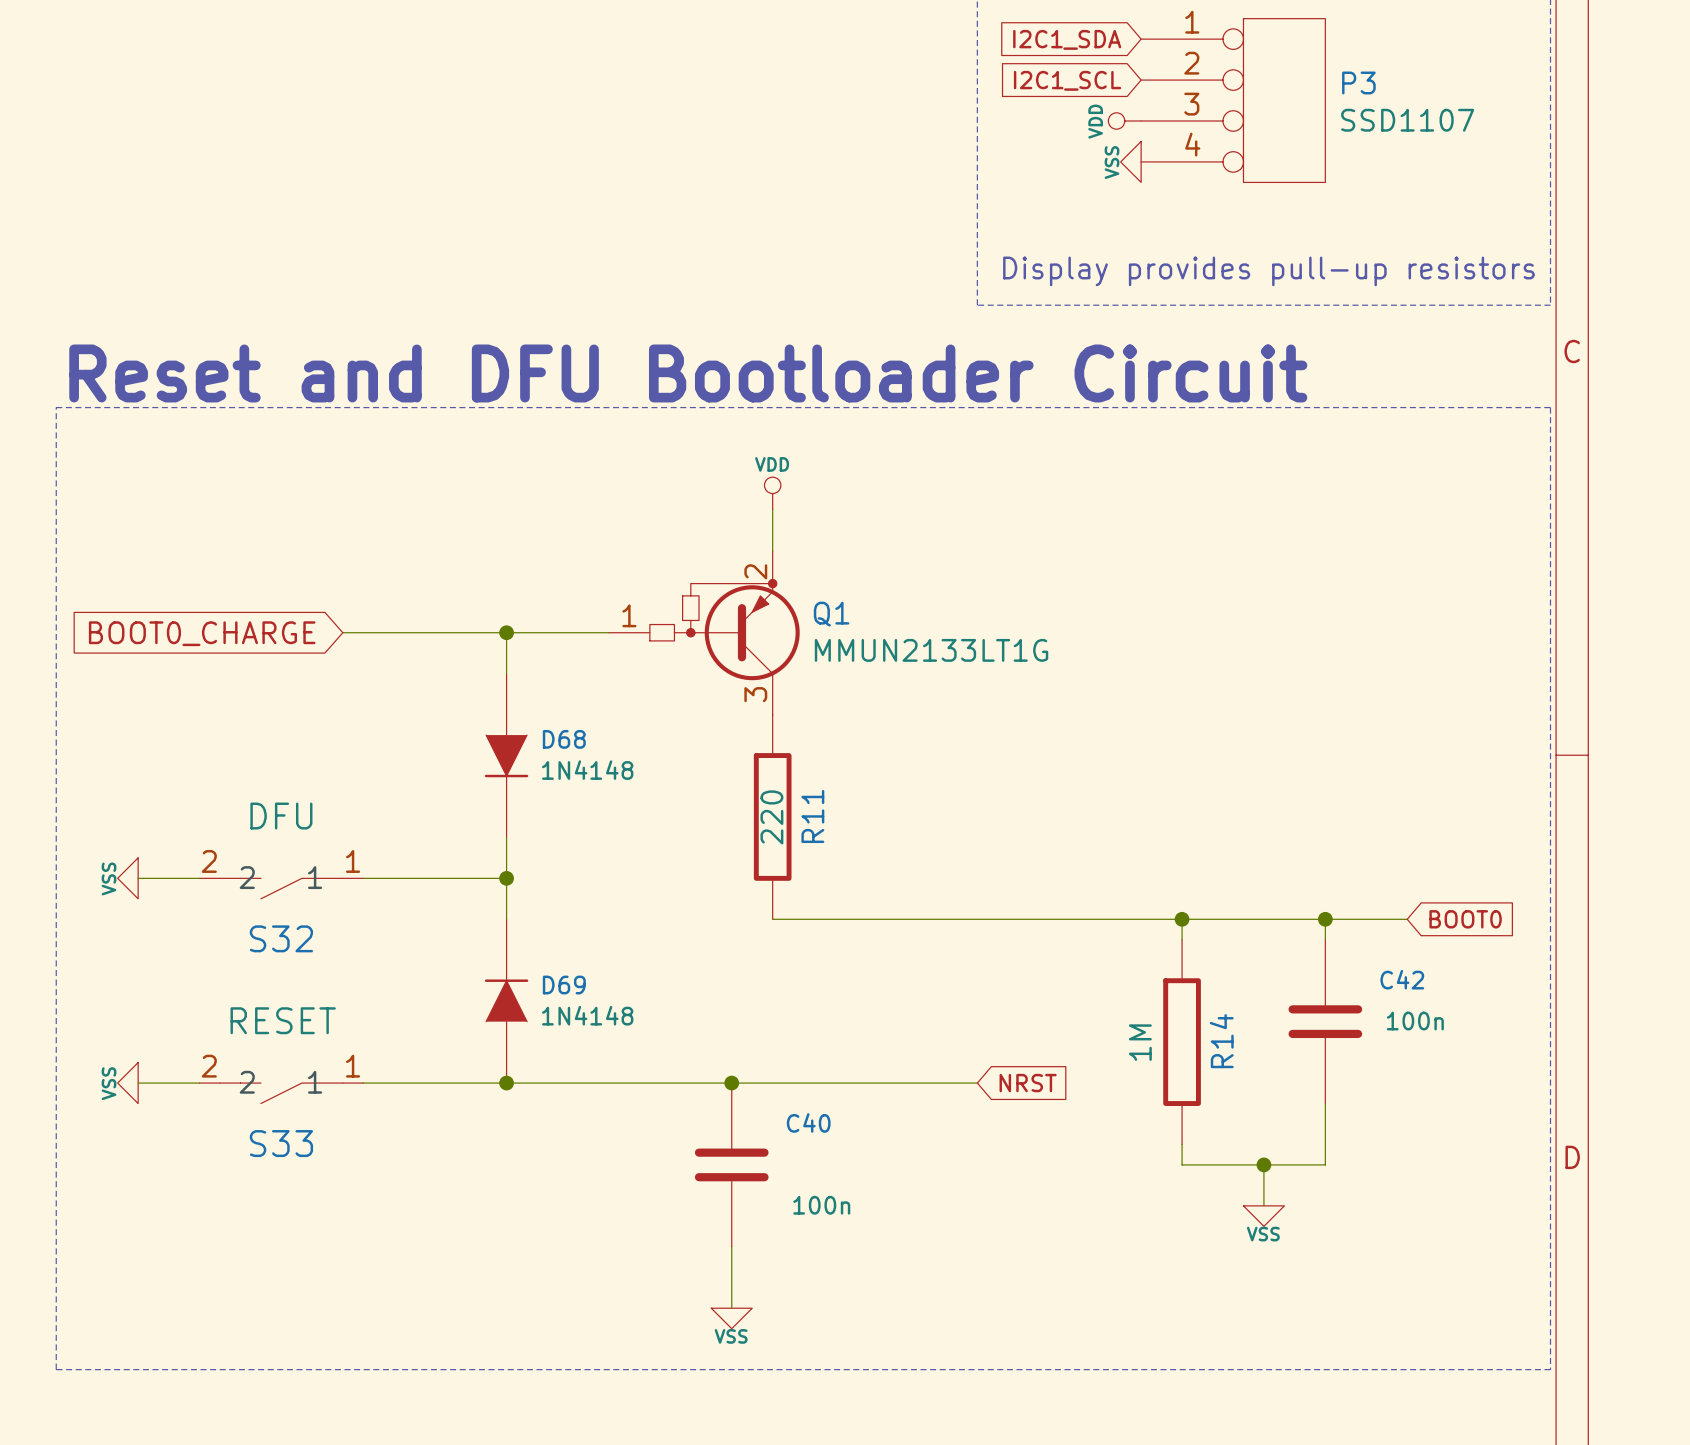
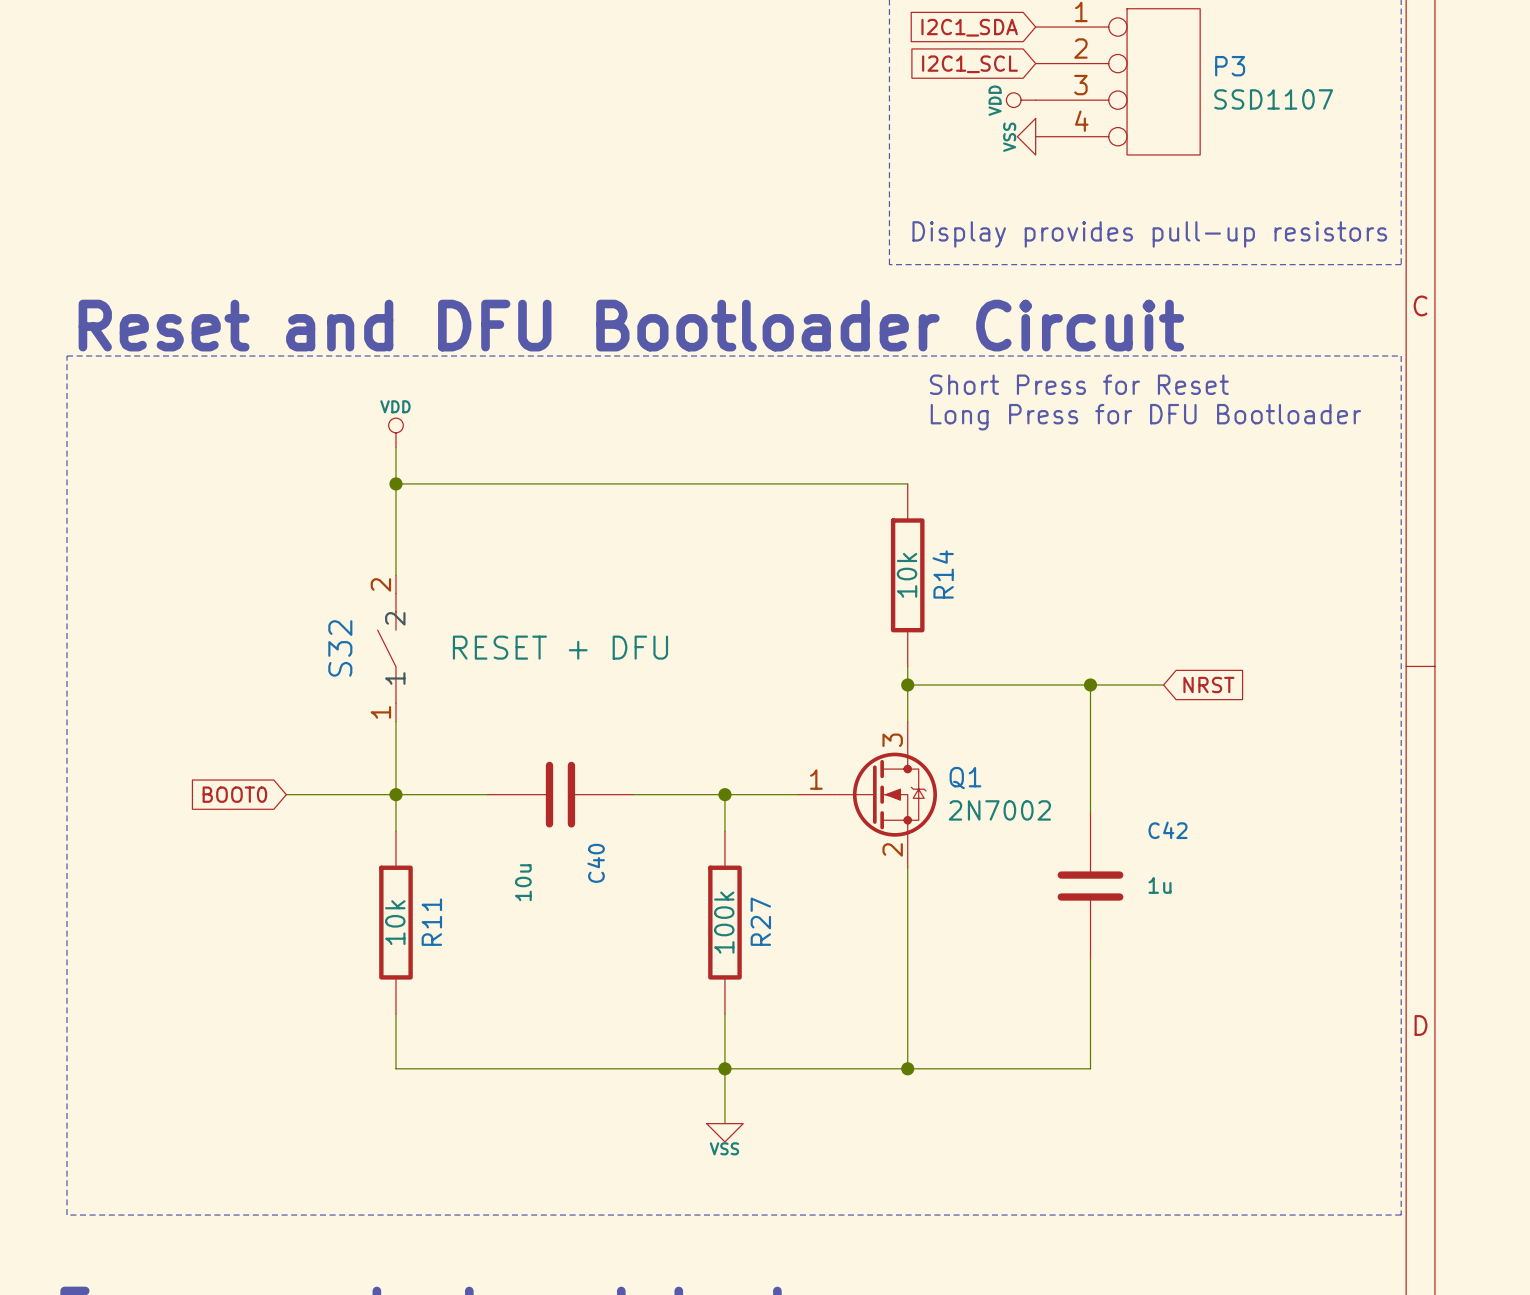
text: none -> Short Press for Reset (1079, 384)
text: none -> Long Press for DFU Bootloader (1145, 417)
power symbol position: VDD (772, 493) -> VDD (395, 432)
wire: none -> (395, 447) (395, 575)
wire: (772, 509) (772, 550) -> (724, 794) (724, 831)
wire: none -> (395, 483) (907, 483)
junction: none -> (395, 483)
Q1 symbol: [608, 550, 800, 715] -> [798, 721, 937, 868]
wire: (342, 632) (608, 632) -> none
wire: (506, 632) (506, 673) -> none
junction: (506, 632) -> none
global label: BOOT0_CHARGE (202, 633) -> none
Q1 value: MMUN2133LT1G (931, 650) -> 2N7002 (999, 810)
D68: 1N4148 (506, 755) -> none
wire: none -> (907, 666) (907, 721)
wire: none -> (907, 685) (1163, 685)
junction: none -> (907, 685)
wire: none -> (1090, 685) (1090, 812)
junction: none -> (1090, 685)
global label: none -> NRST (1208, 685)
S32 value: DFU (281, 816) -> RESET + DFU (560, 647)
wire: none -> (395, 721) (395, 831)
R11 position: (772, 816) -> (395, 922)
R11 value: 220 (771, 817) -> 10k (395, 922)
wire: (506, 837) (506, 919) -> none
power symbol: VSS (127, 878) -> none
wire: (138, 878) (199, 878) -> none
wire: (363, 878) (506, 878) -> none
junction position: (506, 878) -> (395, 794)
S32 rotation: 0° (281, 888) -> 90° clockwise (386, 648)
S32 position: (281, 888) -> (386, 648)
global label: none -> BOOT0 (234, 794)
wire: none -> (286, 794) (487, 794)
wire: none -> (633, 794) (798, 794)
junction: none -> (724, 794)
wire: (772, 919) (1407, 919) -> none
wire: (1182, 919) (1182, 939) -> none
junction: (1182, 919) -> none
wire: (1325, 919) (1325, 939) -> none
junction: (1325, 919) -> none
global label: BOOT0 (1465, 919) -> none
C42 name position: C42 (1402, 979) -> C42 (1168, 830)
wire: none -> (907, 867) (907, 1068)
D69: 1N4148 (506, 1001) -> none
C42 position: (1325, 1021) -> (1090, 886)
C42 value: 100n (1415, 1021) -> 1u (1160, 885)
R27: none -> 100k (724, 922)
R14 value: 1M (1140, 1042) -> 10k (907, 575)
R14 position: (1182, 1042) -> (907, 575)
power symbol: VSS (127, 1083) -> none
wire: (138, 1083) (199, 1083) -> none
wire: (363, 1083) (977, 1083) -> none
junction: (506, 1083) -> none
junction: (731, 1083) -> none
global label: NRST (1028, 1083) -> none
wire: none -> (1090, 959) (1090, 1068) (395, 1068) (395, 1013)
S33: RESET (281, 1093) -> none
wire: (1325, 1103) (1325, 1164) (1182, 1164) (1182, 1144) -> none
wire: none -> (724, 1013) (724, 1123)
C40 rotation: 0° (731, 1164) -> 90° clockwise (560, 794)
C40 position: (731, 1164) -> (560, 794)
wire: (1263, 1164) (1263, 1205) -> none
junction: (1263, 1164) -> none
junction: none -> (724, 1068)
C40 value: 100n (821, 1205) -> 10u (523, 882)
junction: none -> (907, 1068)
power symbol: VSS (1263, 1216) -> none
wire: (731, 1246) (731, 1308) -> none
power symbol position: VSS (731, 1318) -> VSS (724, 1132)

